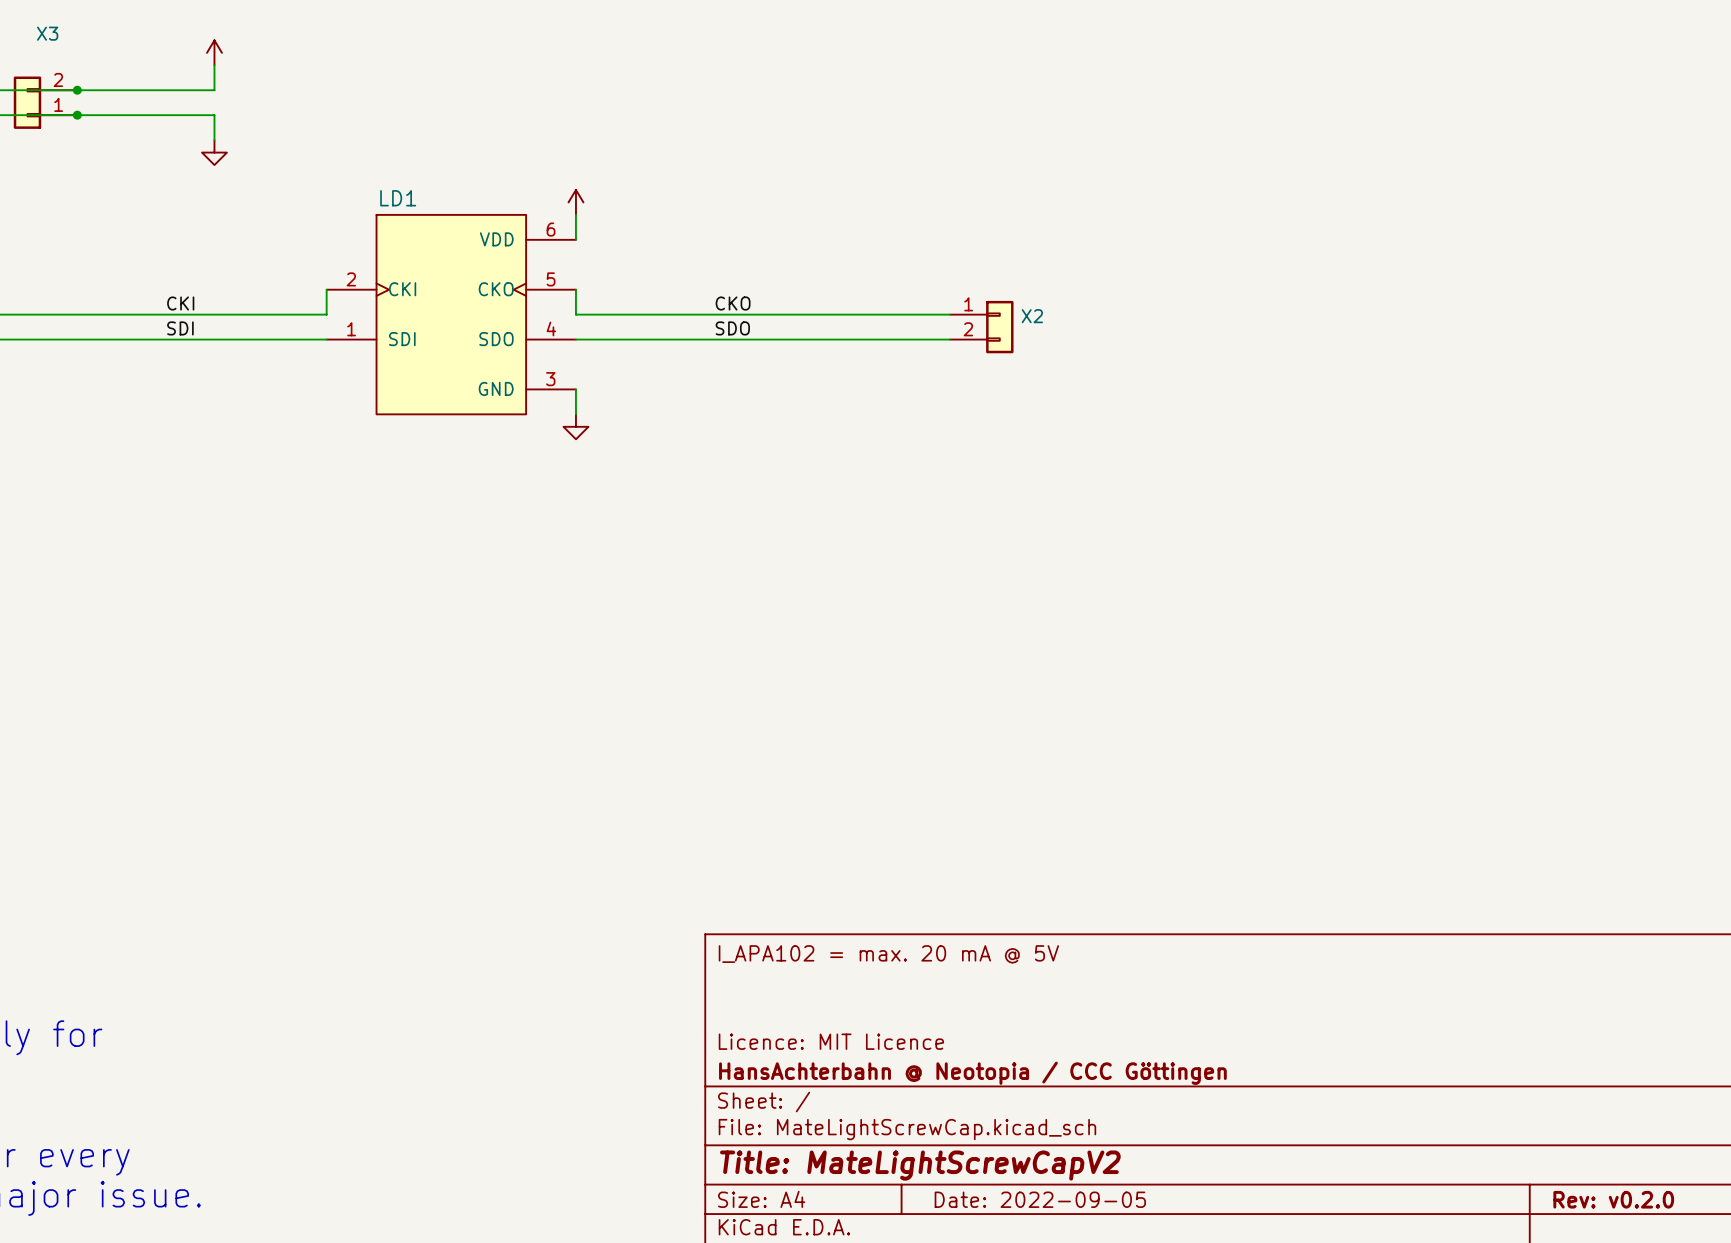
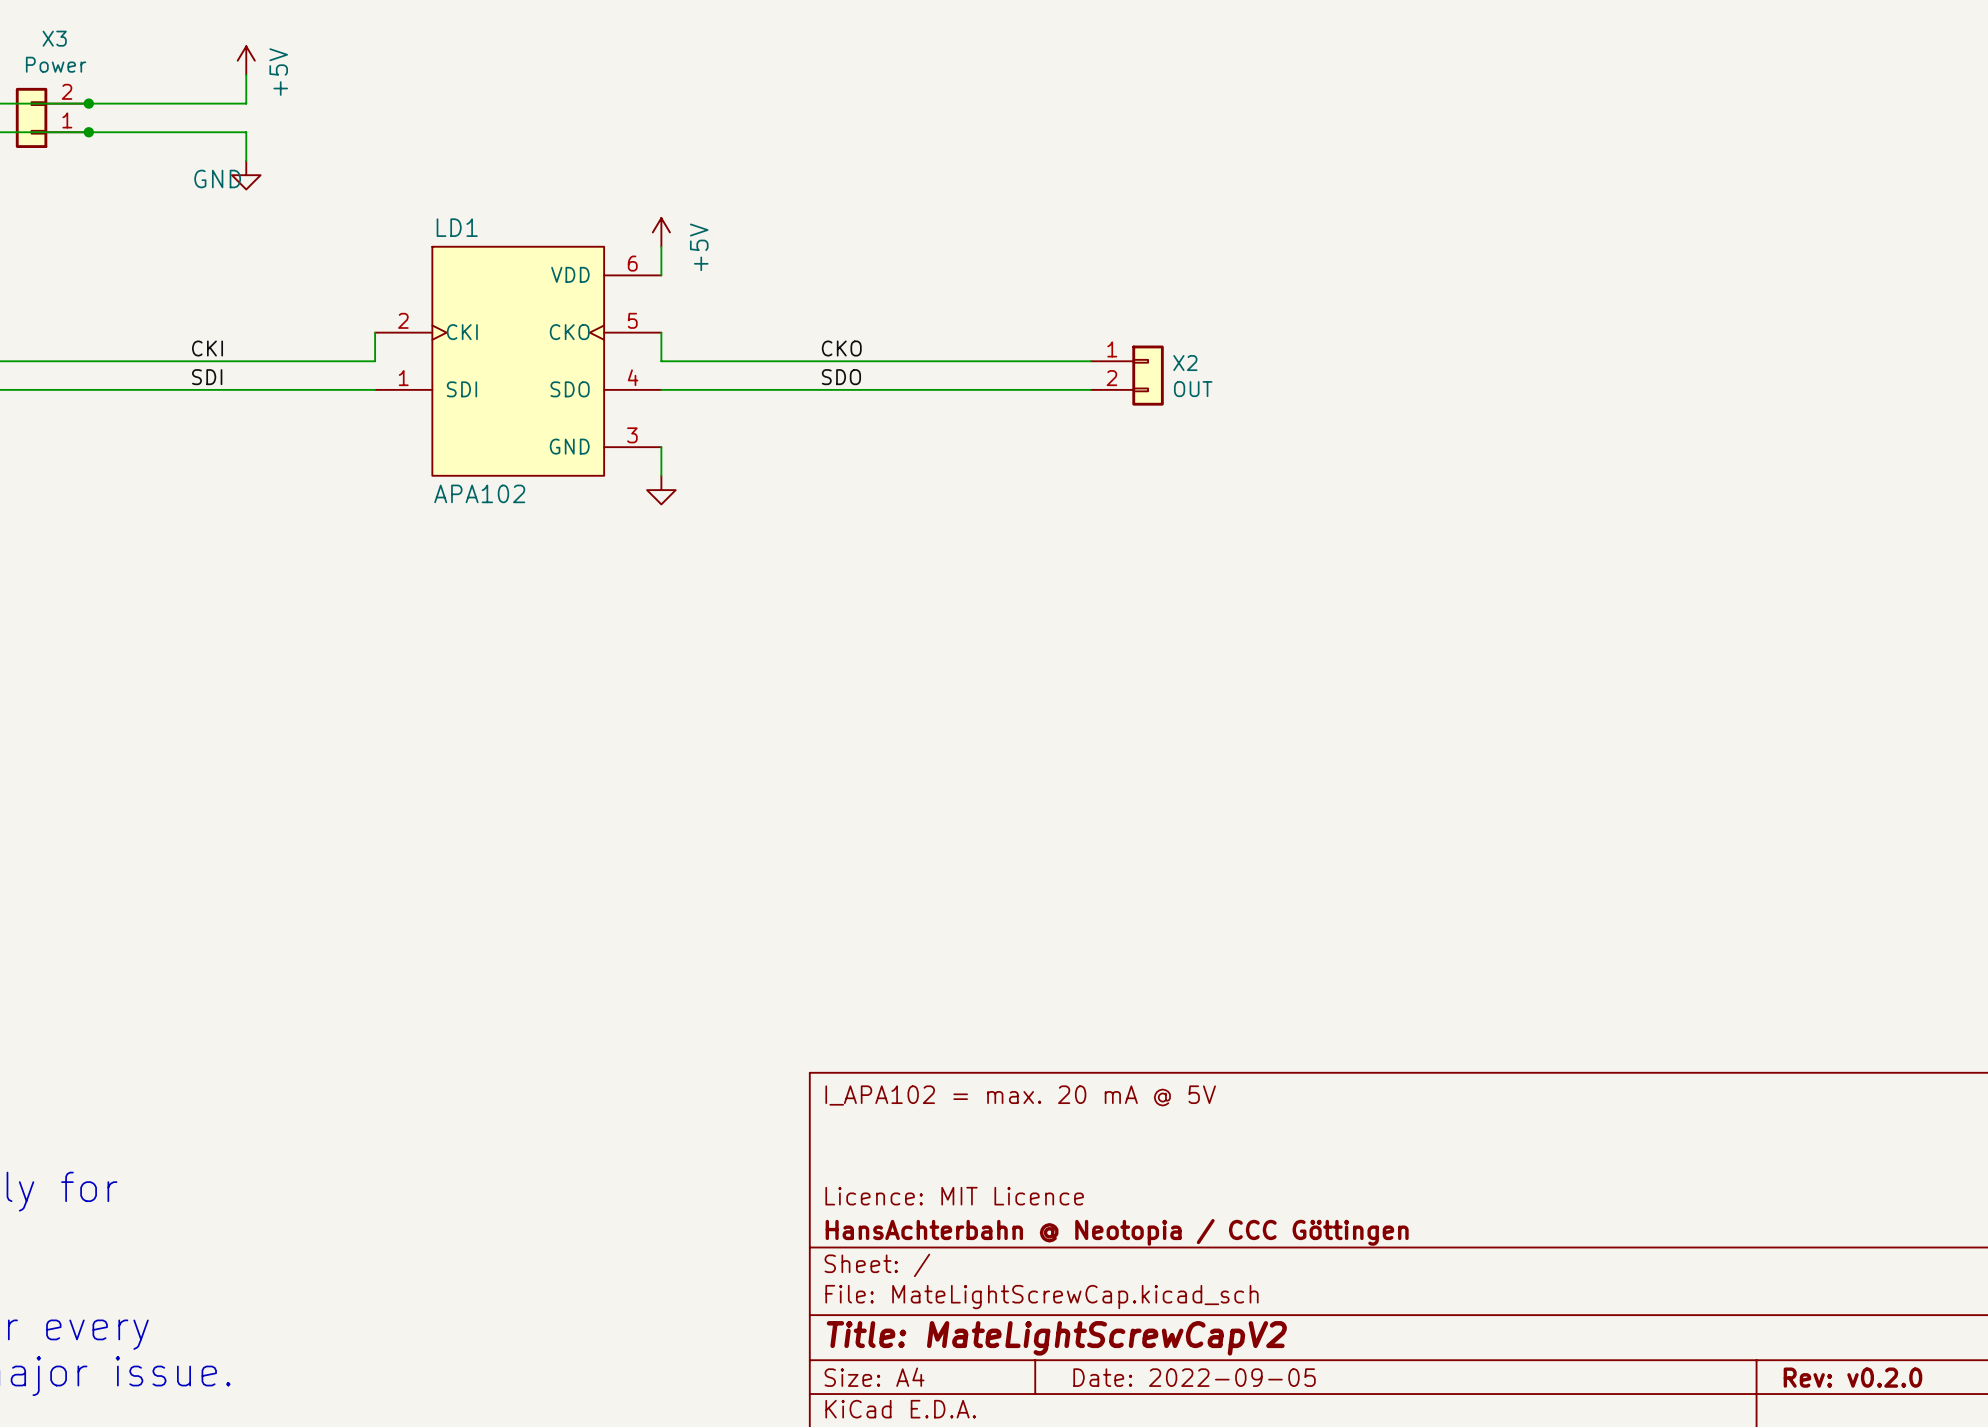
X3 value: none -> Power (56, 64)
power symbol text: none -> +5V (278, 72)
power symbol text: none -> GND (217, 178)
power symbol text: none -> +5V (699, 247)
X2 value: none -> OUT (1193, 389)
LD1 value: none -> APA102 (479, 493)

